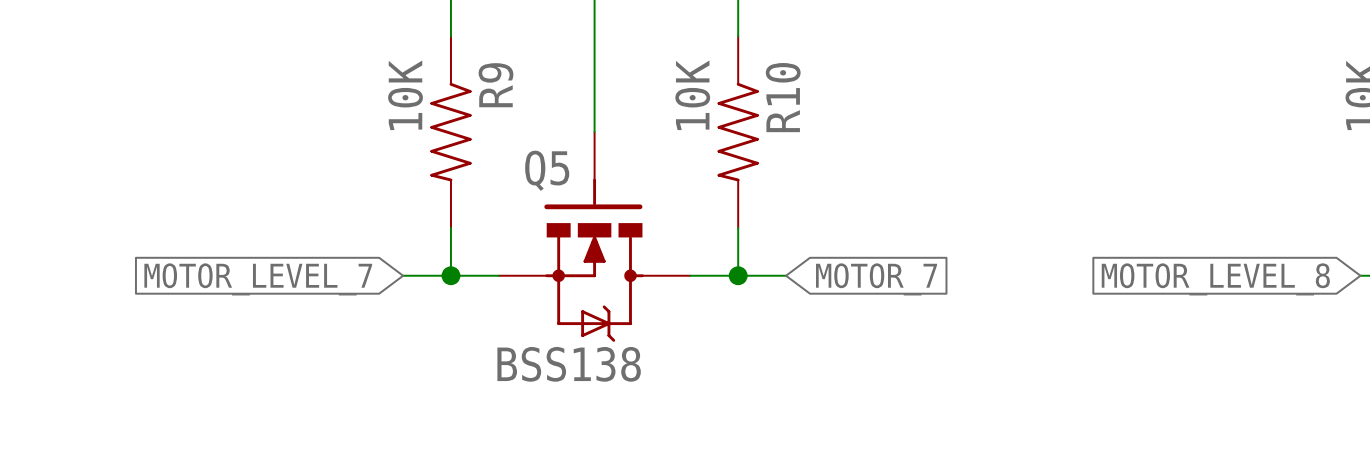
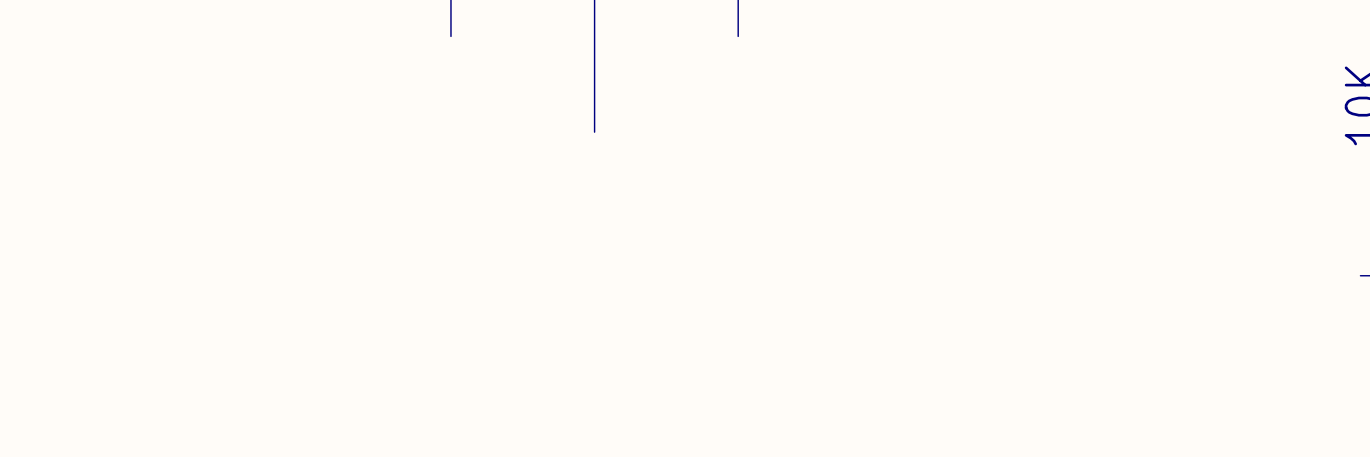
R9: 10K (450, 132) -> none
R10: 10K (738, 132) -> none
wire: (450, 227) (450, 275) -> none
wire: (738, 227) (738, 275) -> none
Q5: BSS138 (594, 236) -> none
wire: (403, 275) (498, 275) -> none
junction: (450, 275) -> none
wire: (690, 275) (786, 275) -> none
junction: (738, 275) -> none
global label: MOTOR_LEVEL_7 (258, 279) -> none
global label: MOTOR_7 (876, 279) -> none
global label: MOTOR_LEVEL_8 (1215, 279) -> none

